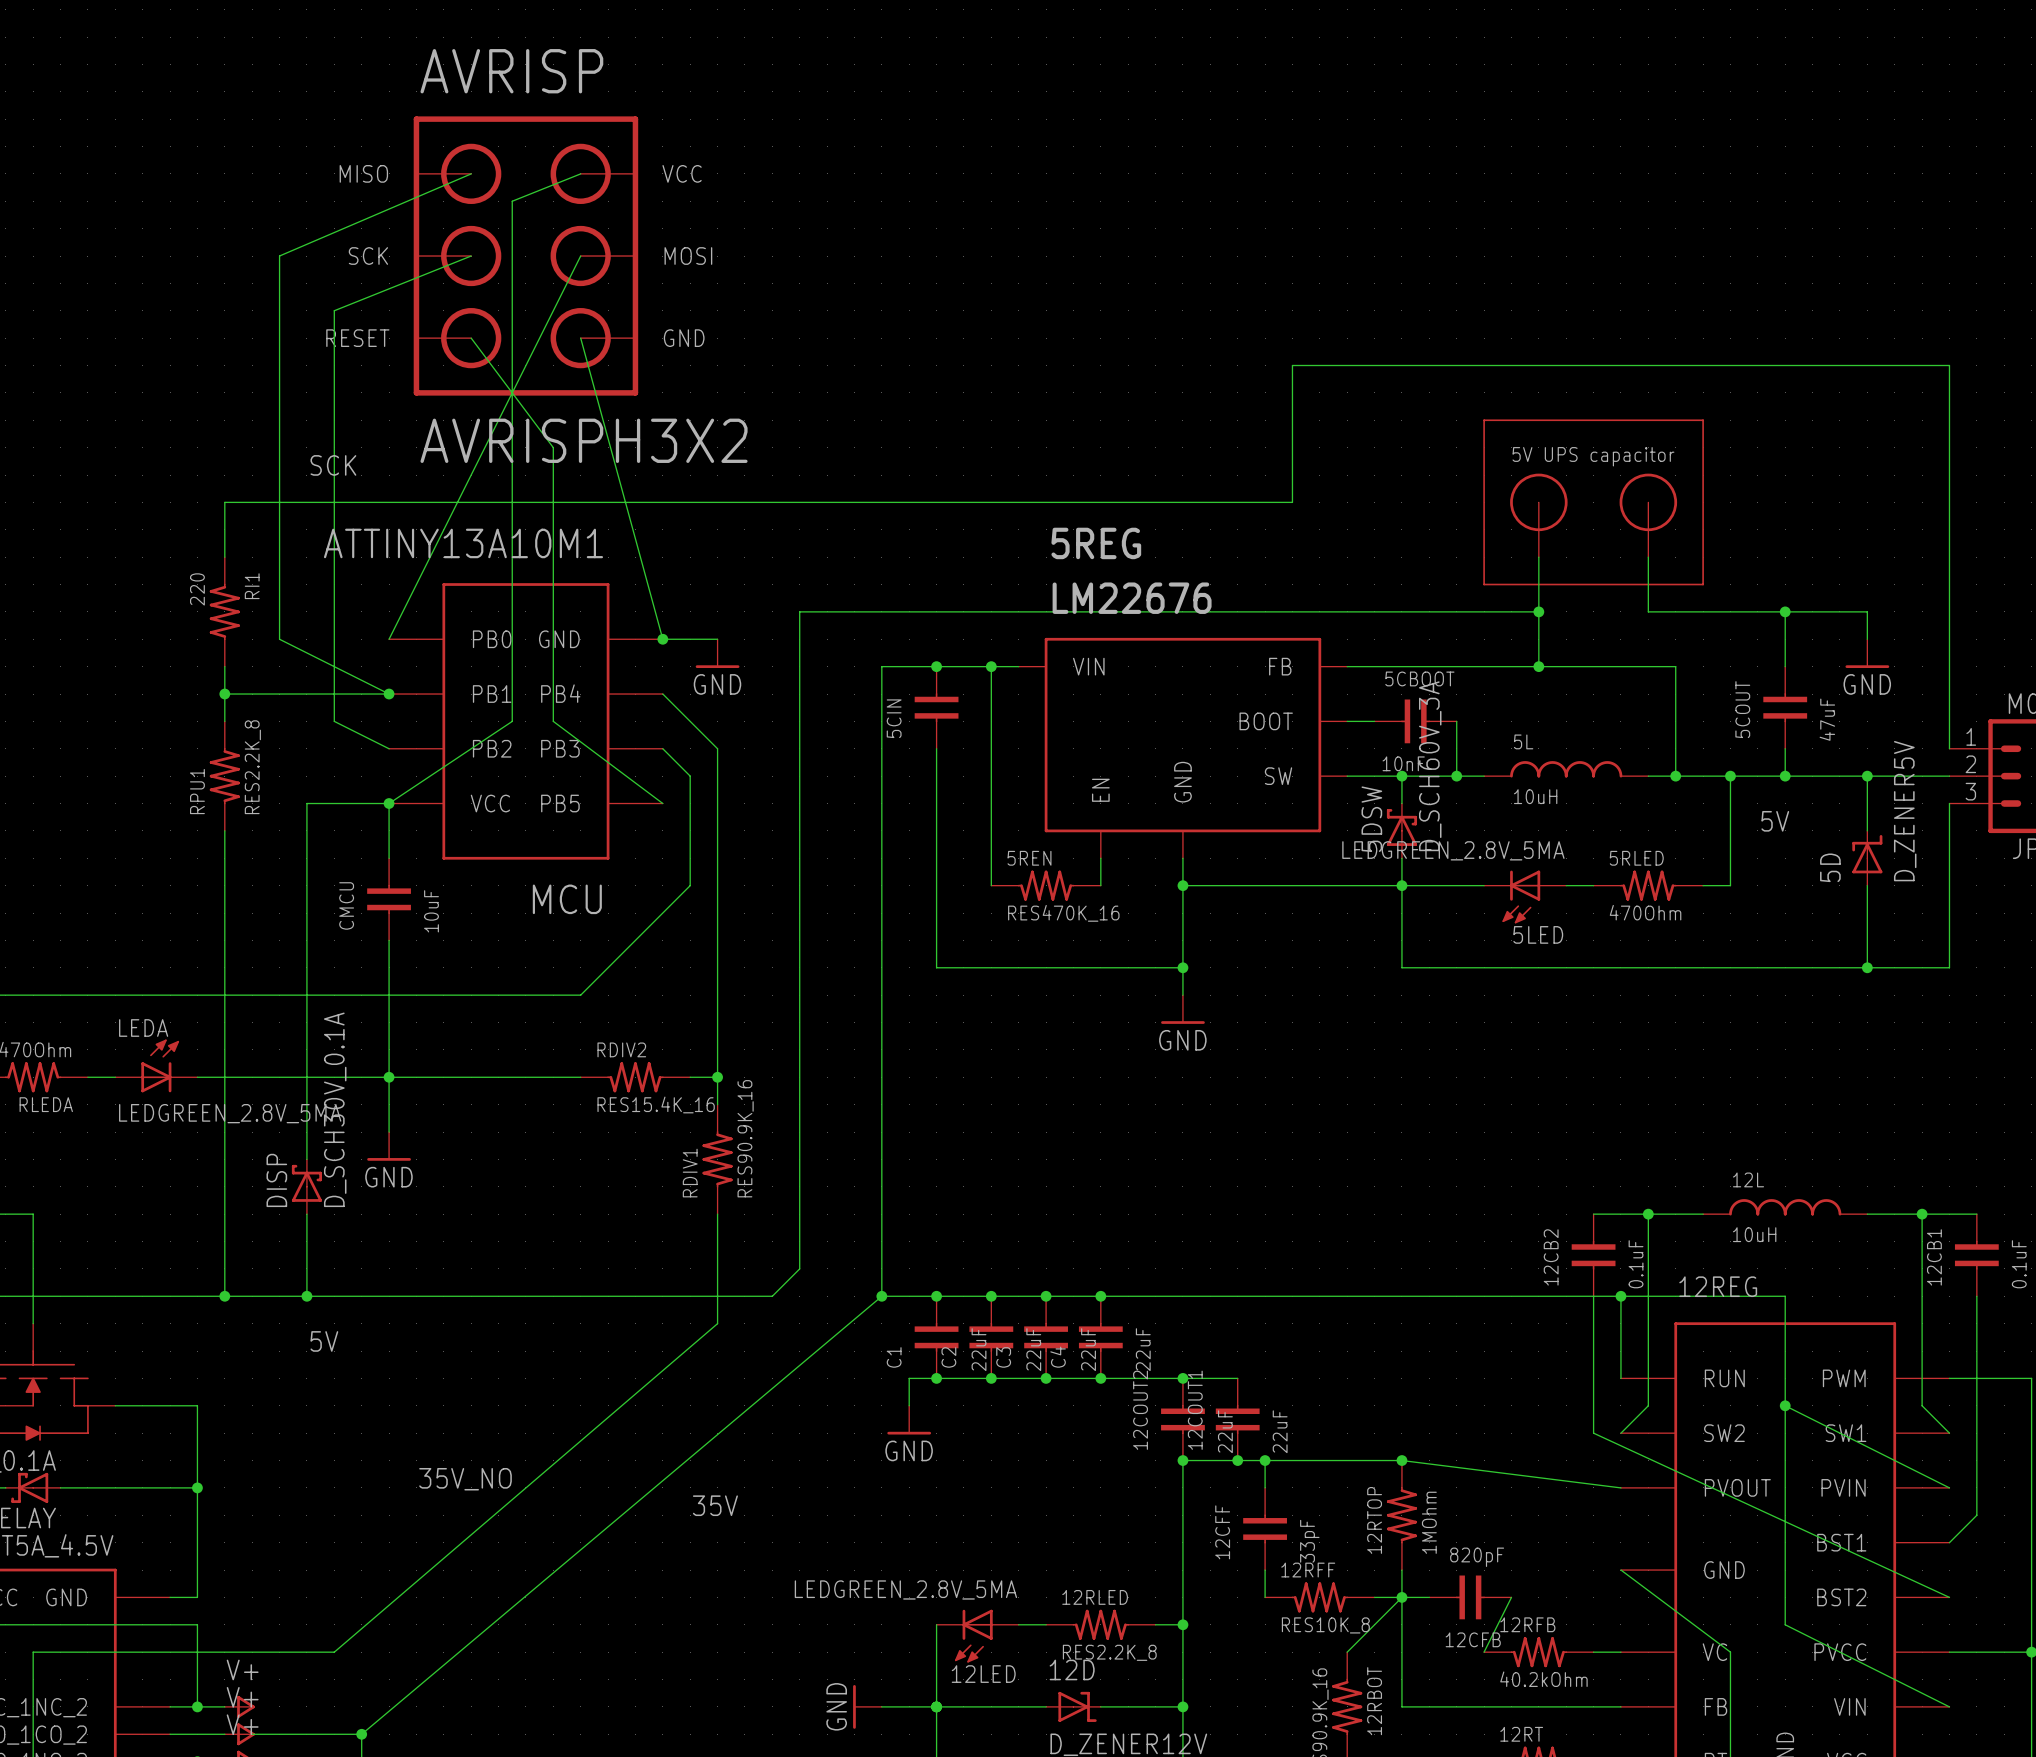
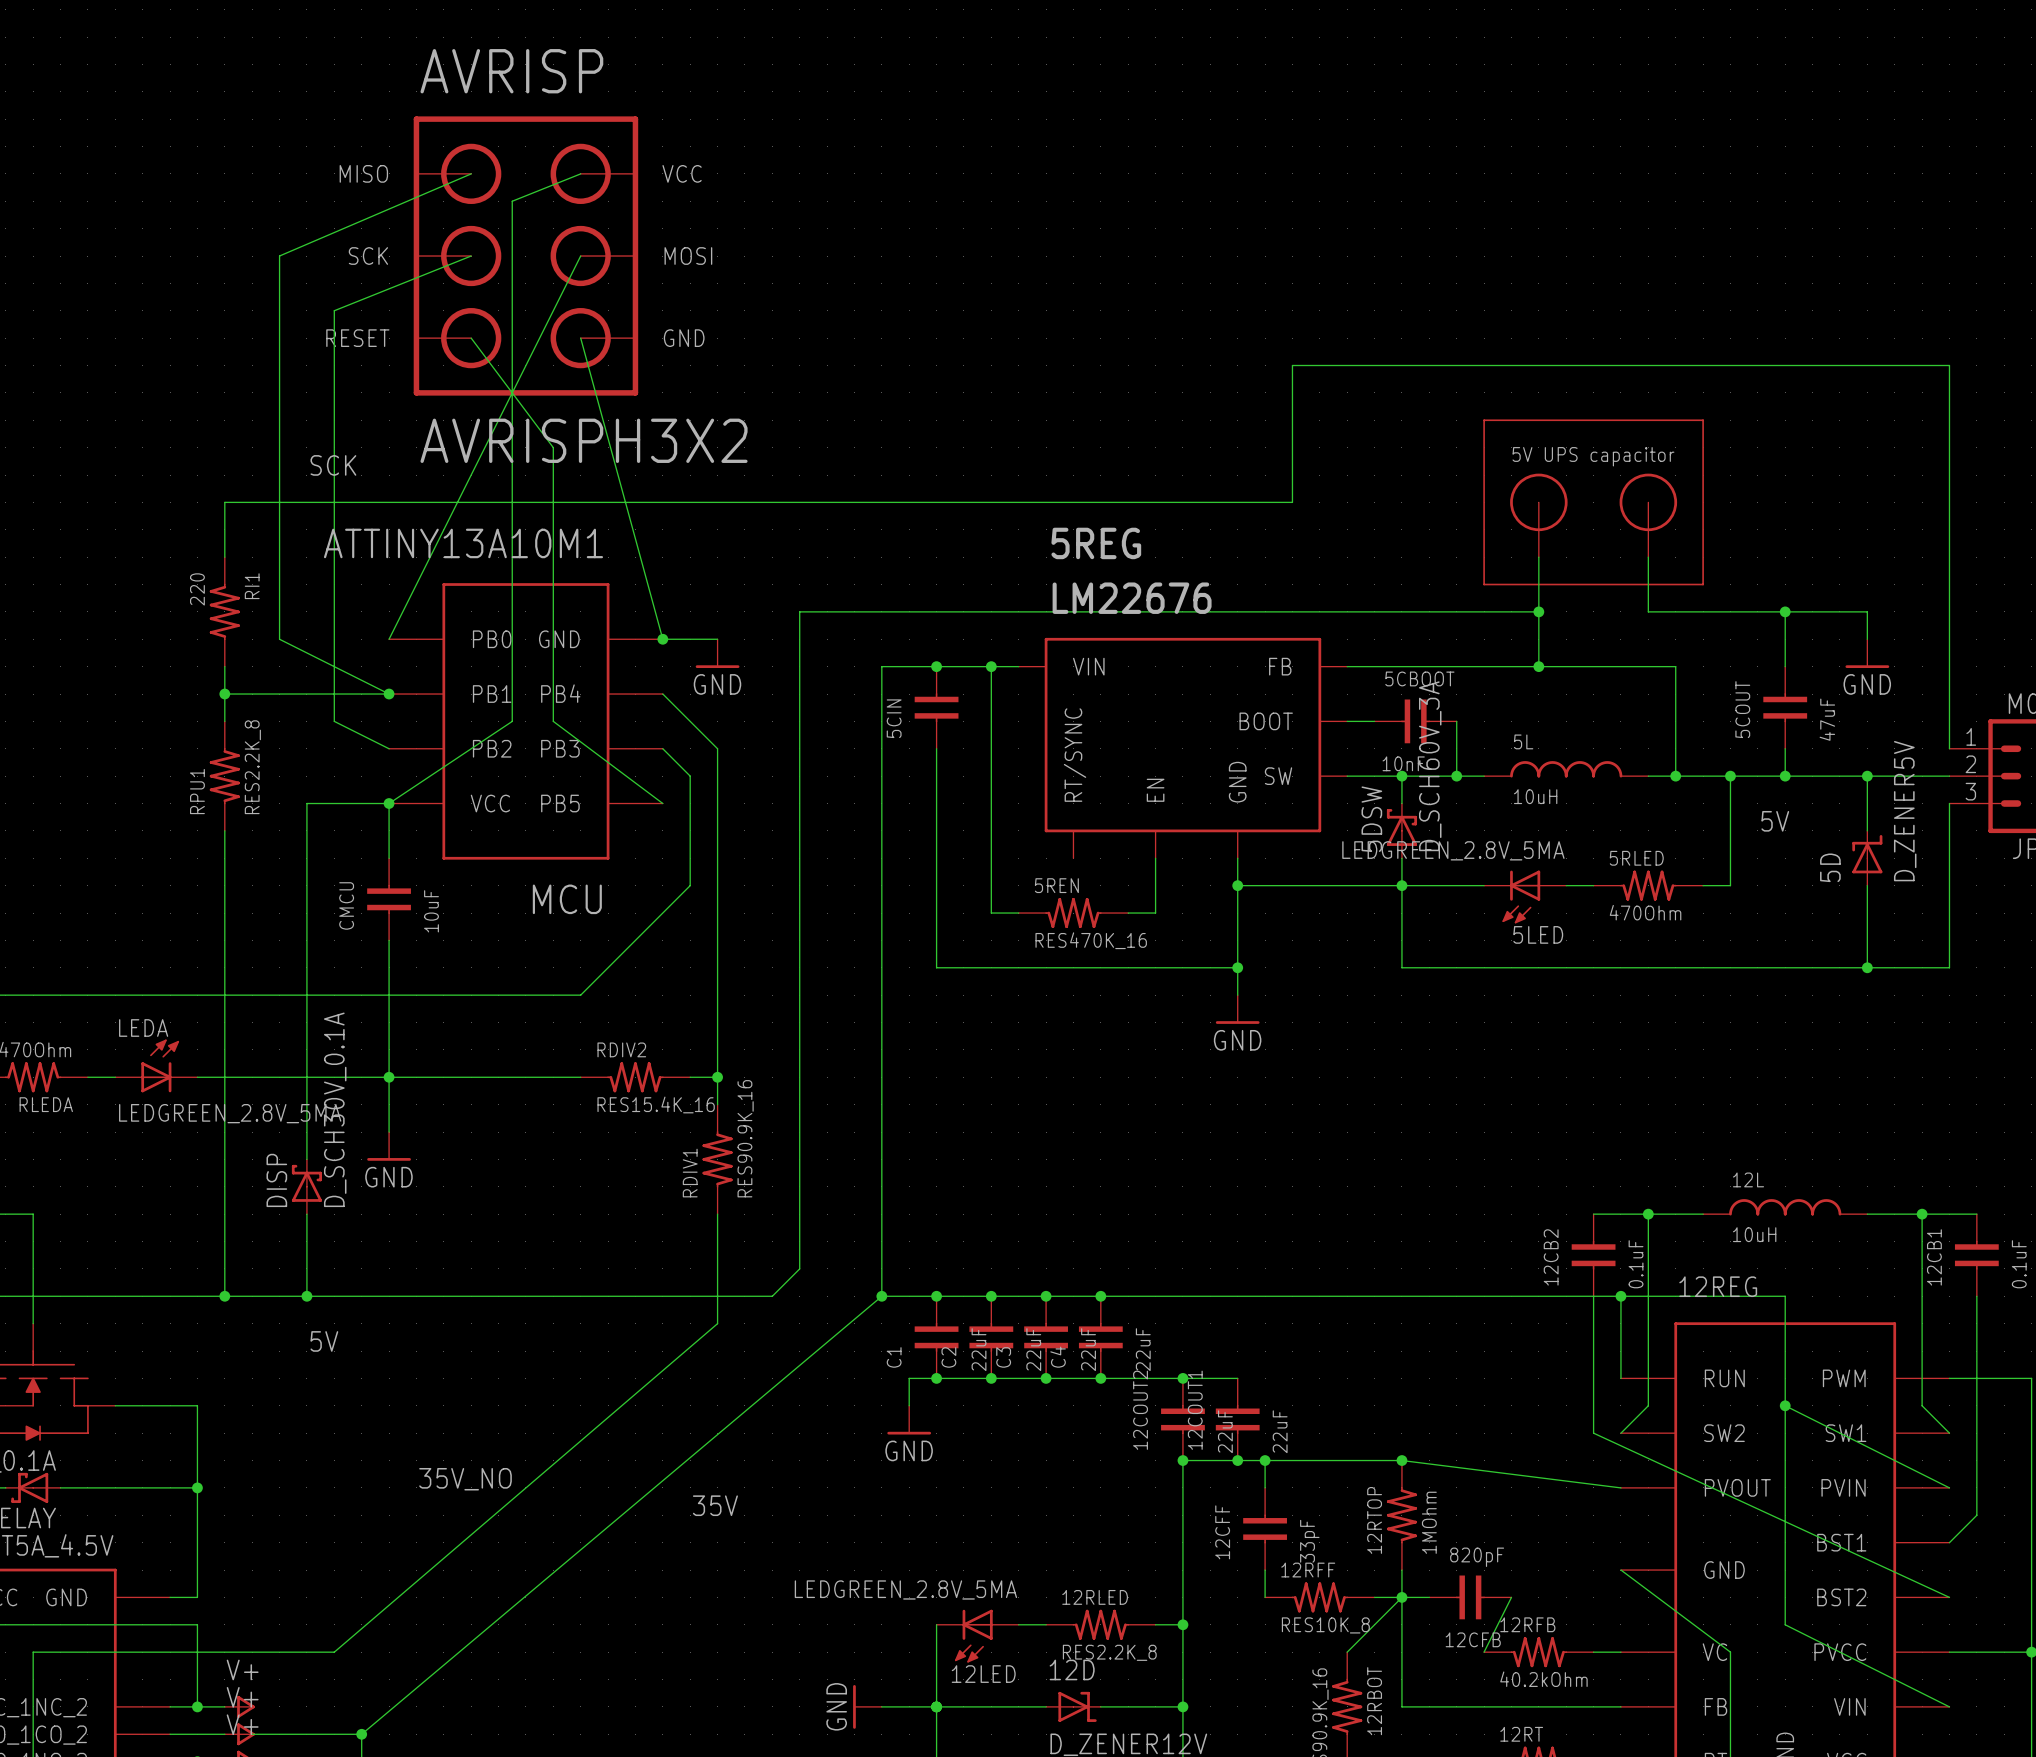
5REG symbol: [1018, 637, 1348, 859] -> [1018, 637, 1348, 859]
wire: (1100, 858) (1100, 885) -> none
wire: none -> (1155, 858) (1155, 913) (1128, 913)
wire: (1182, 858) (1182, 995) -> (1237, 858) (1237, 995)
wire: none -> (991, 885) (991, 913) (1018, 913)
5REN position: (1046, 885) -> (1073, 913)
wire: (1182, 885) (1237, 885) -> (1182, 967) (1237, 967)
junction: (1182, 885) -> none
junction: none -> (1237, 885)
junction: (1182, 967) -> none
junction: none -> (1237, 967)
power symbol position: GND (1182, 1009) -> GND (1237, 1009)

